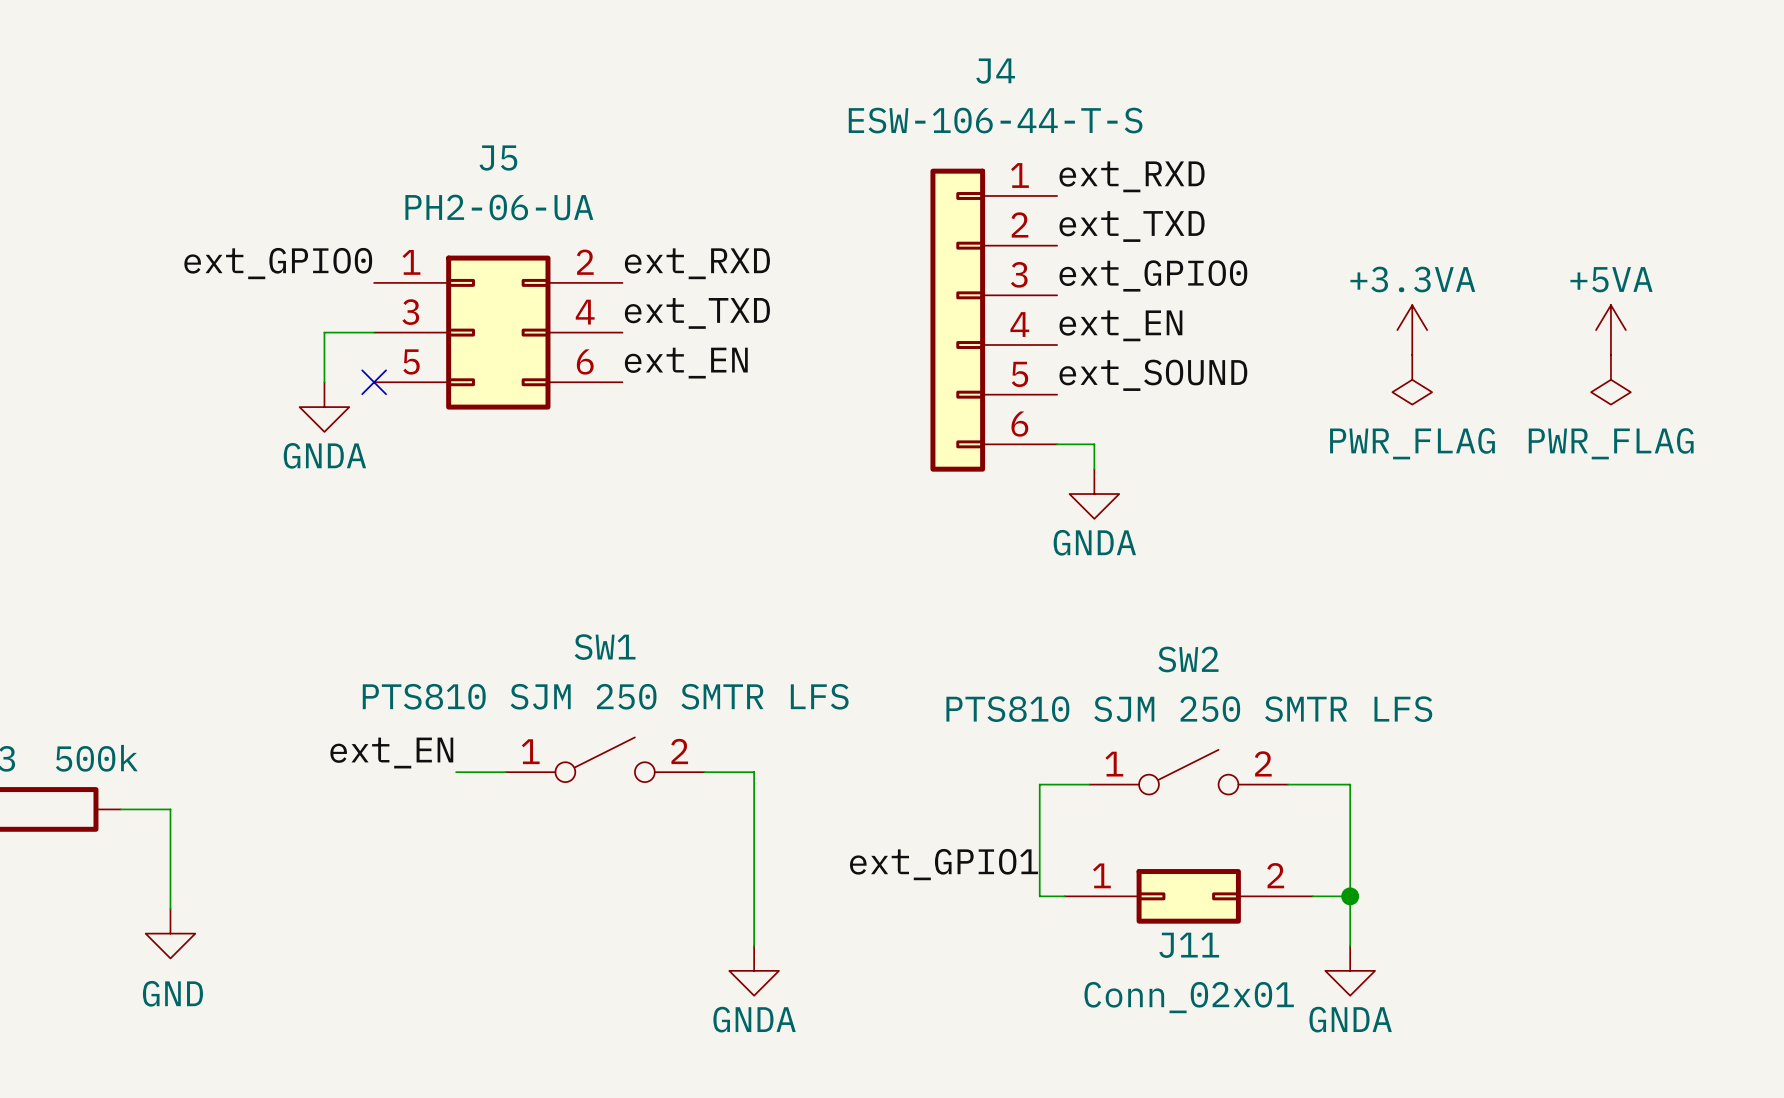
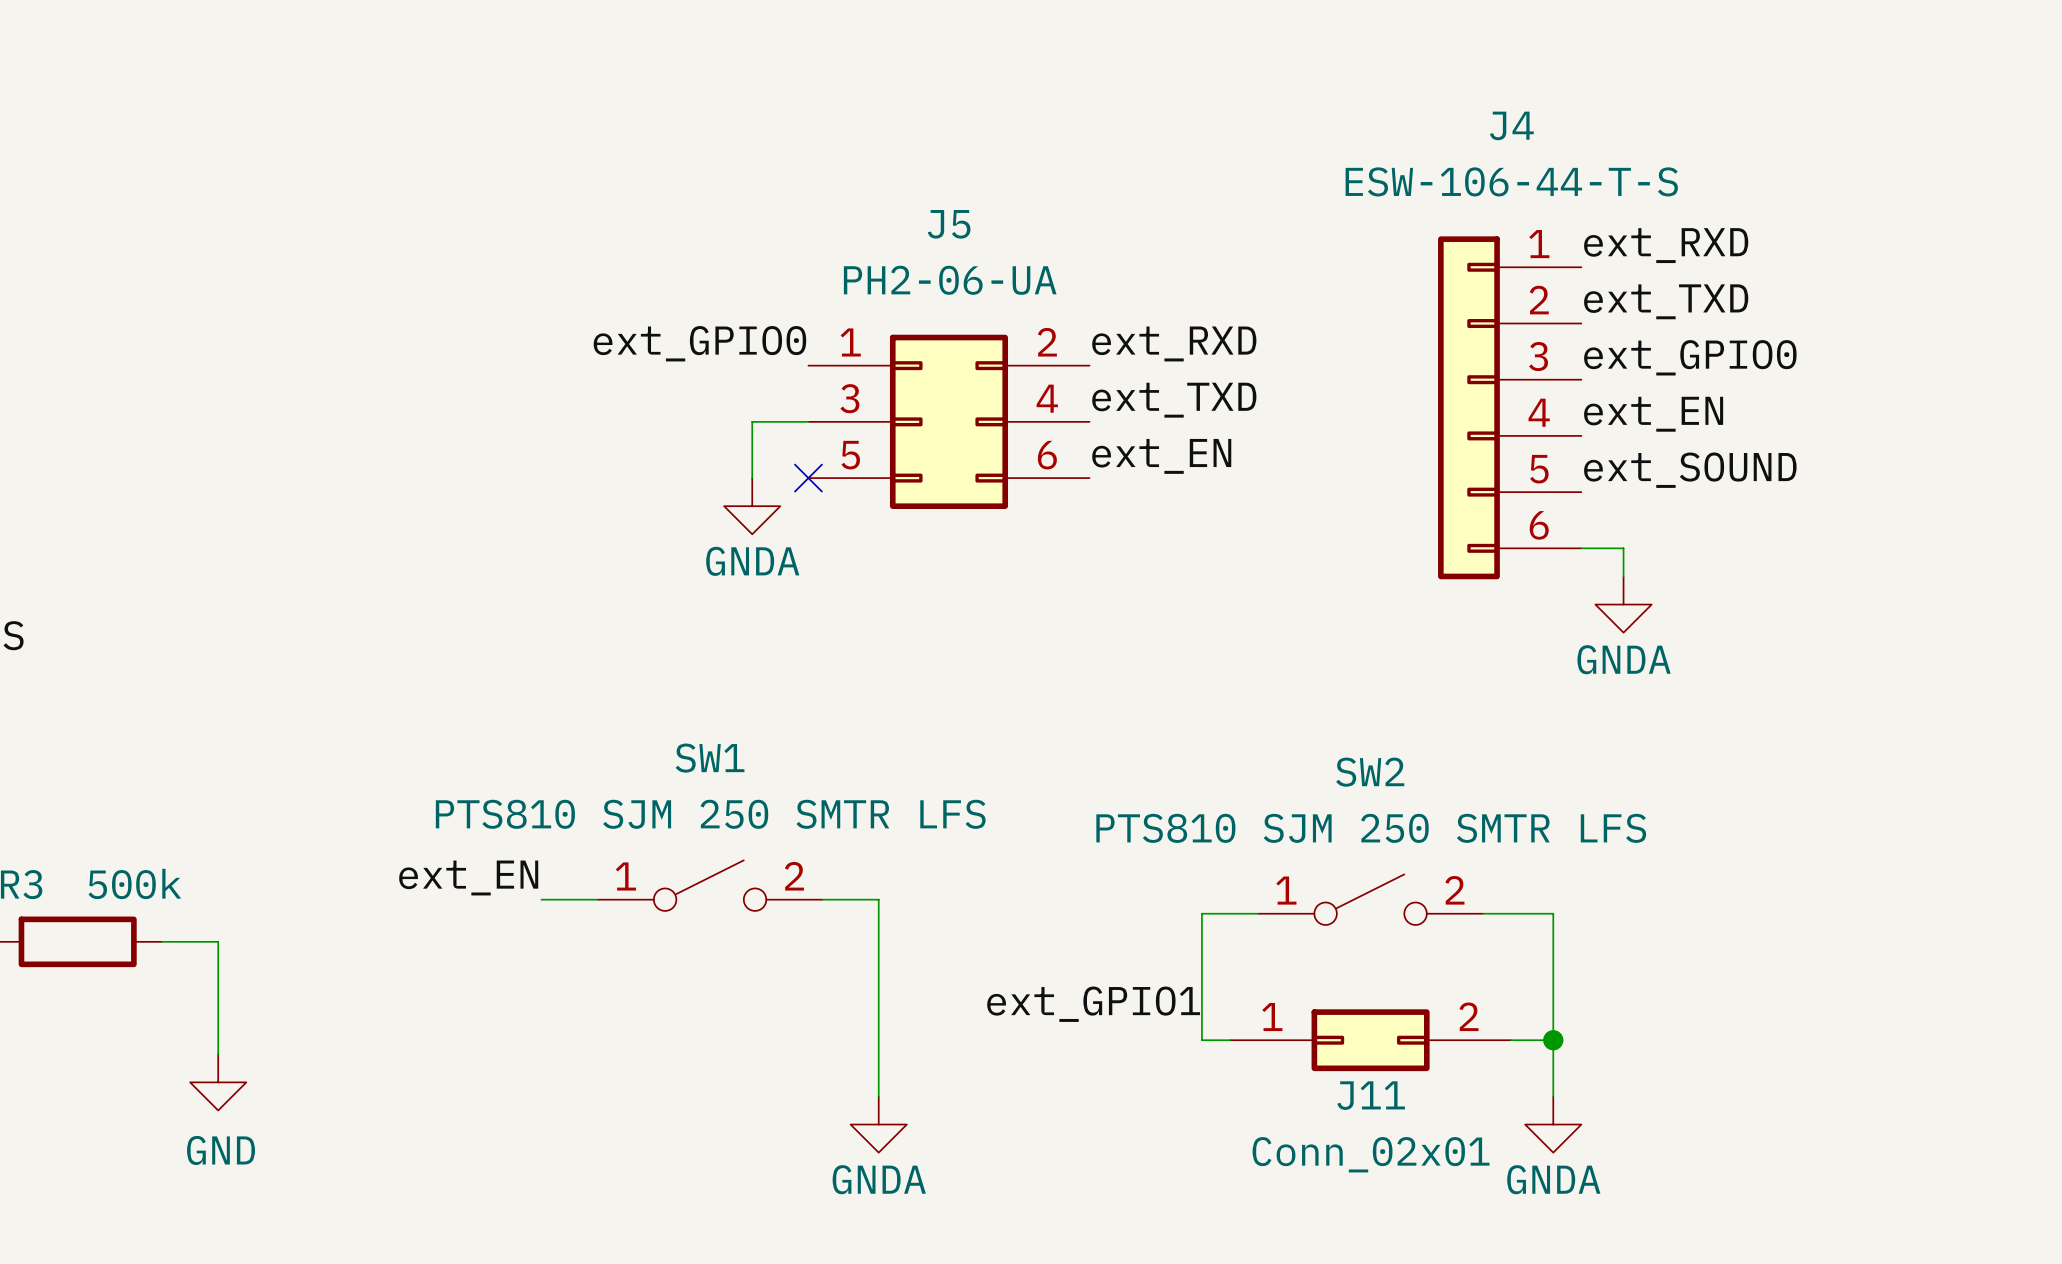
label position: ext_RXD (1132, 176) -> ext_RXD (1174, 343)
label: none -> ext_RXD (1666, 245)
label position: ext_TXD (1132, 226) -> ext_TXD (1174, 400)
label: none -> ext_TXD (1666, 301)
label: ext_GPIO0 (278, 263) -> none
label: ext_RXD (697, 263) -> none
label: ext_GPIO0 (1153, 275) -> none
label: none -> ext_GPIO0 (699, 343)
label: none -> ext_GPIO0 (1690, 357)
label: ext_TXD (697, 313) -> none
J4 position: (993, 320) -> (1509, 407)
label position: ext_EN (1120, 325) -> ext_EN (1161, 456)
power symbol: +3.3VA (1412, 330) -> none
power symbol: +5VA (1610, 330) -> none
wire: (374, 332) (324, 332) (324, 382) -> (808, 421) (752, 421) (752, 478)
J5 position: (498, 332) -> (948, 421)
label: none -> ext_EN (1653, 414)
label: ext_EN (686, 363) -> none
label position: ext_SOUND (1153, 375) -> ext_SOUND (1690, 470)
power symbol: PWR_FLAG (1412, 379) -> none
power symbol: PWR_FLAG (1610, 379) -> none
no-connect mark: (374, 382) -> none
no-connect mark: none -> (808, 478)
power symbol: GNDA (324, 407) -> none
power symbol: none -> GNDA (752, 506)
wire: (1057, 444) (1094, 444) (1094, 469) -> (1581, 548) (1623, 548) (1623, 576)
power symbol: GNDA (1094, 494) -> none
power symbol: none -> GNDA (1623, 604)

